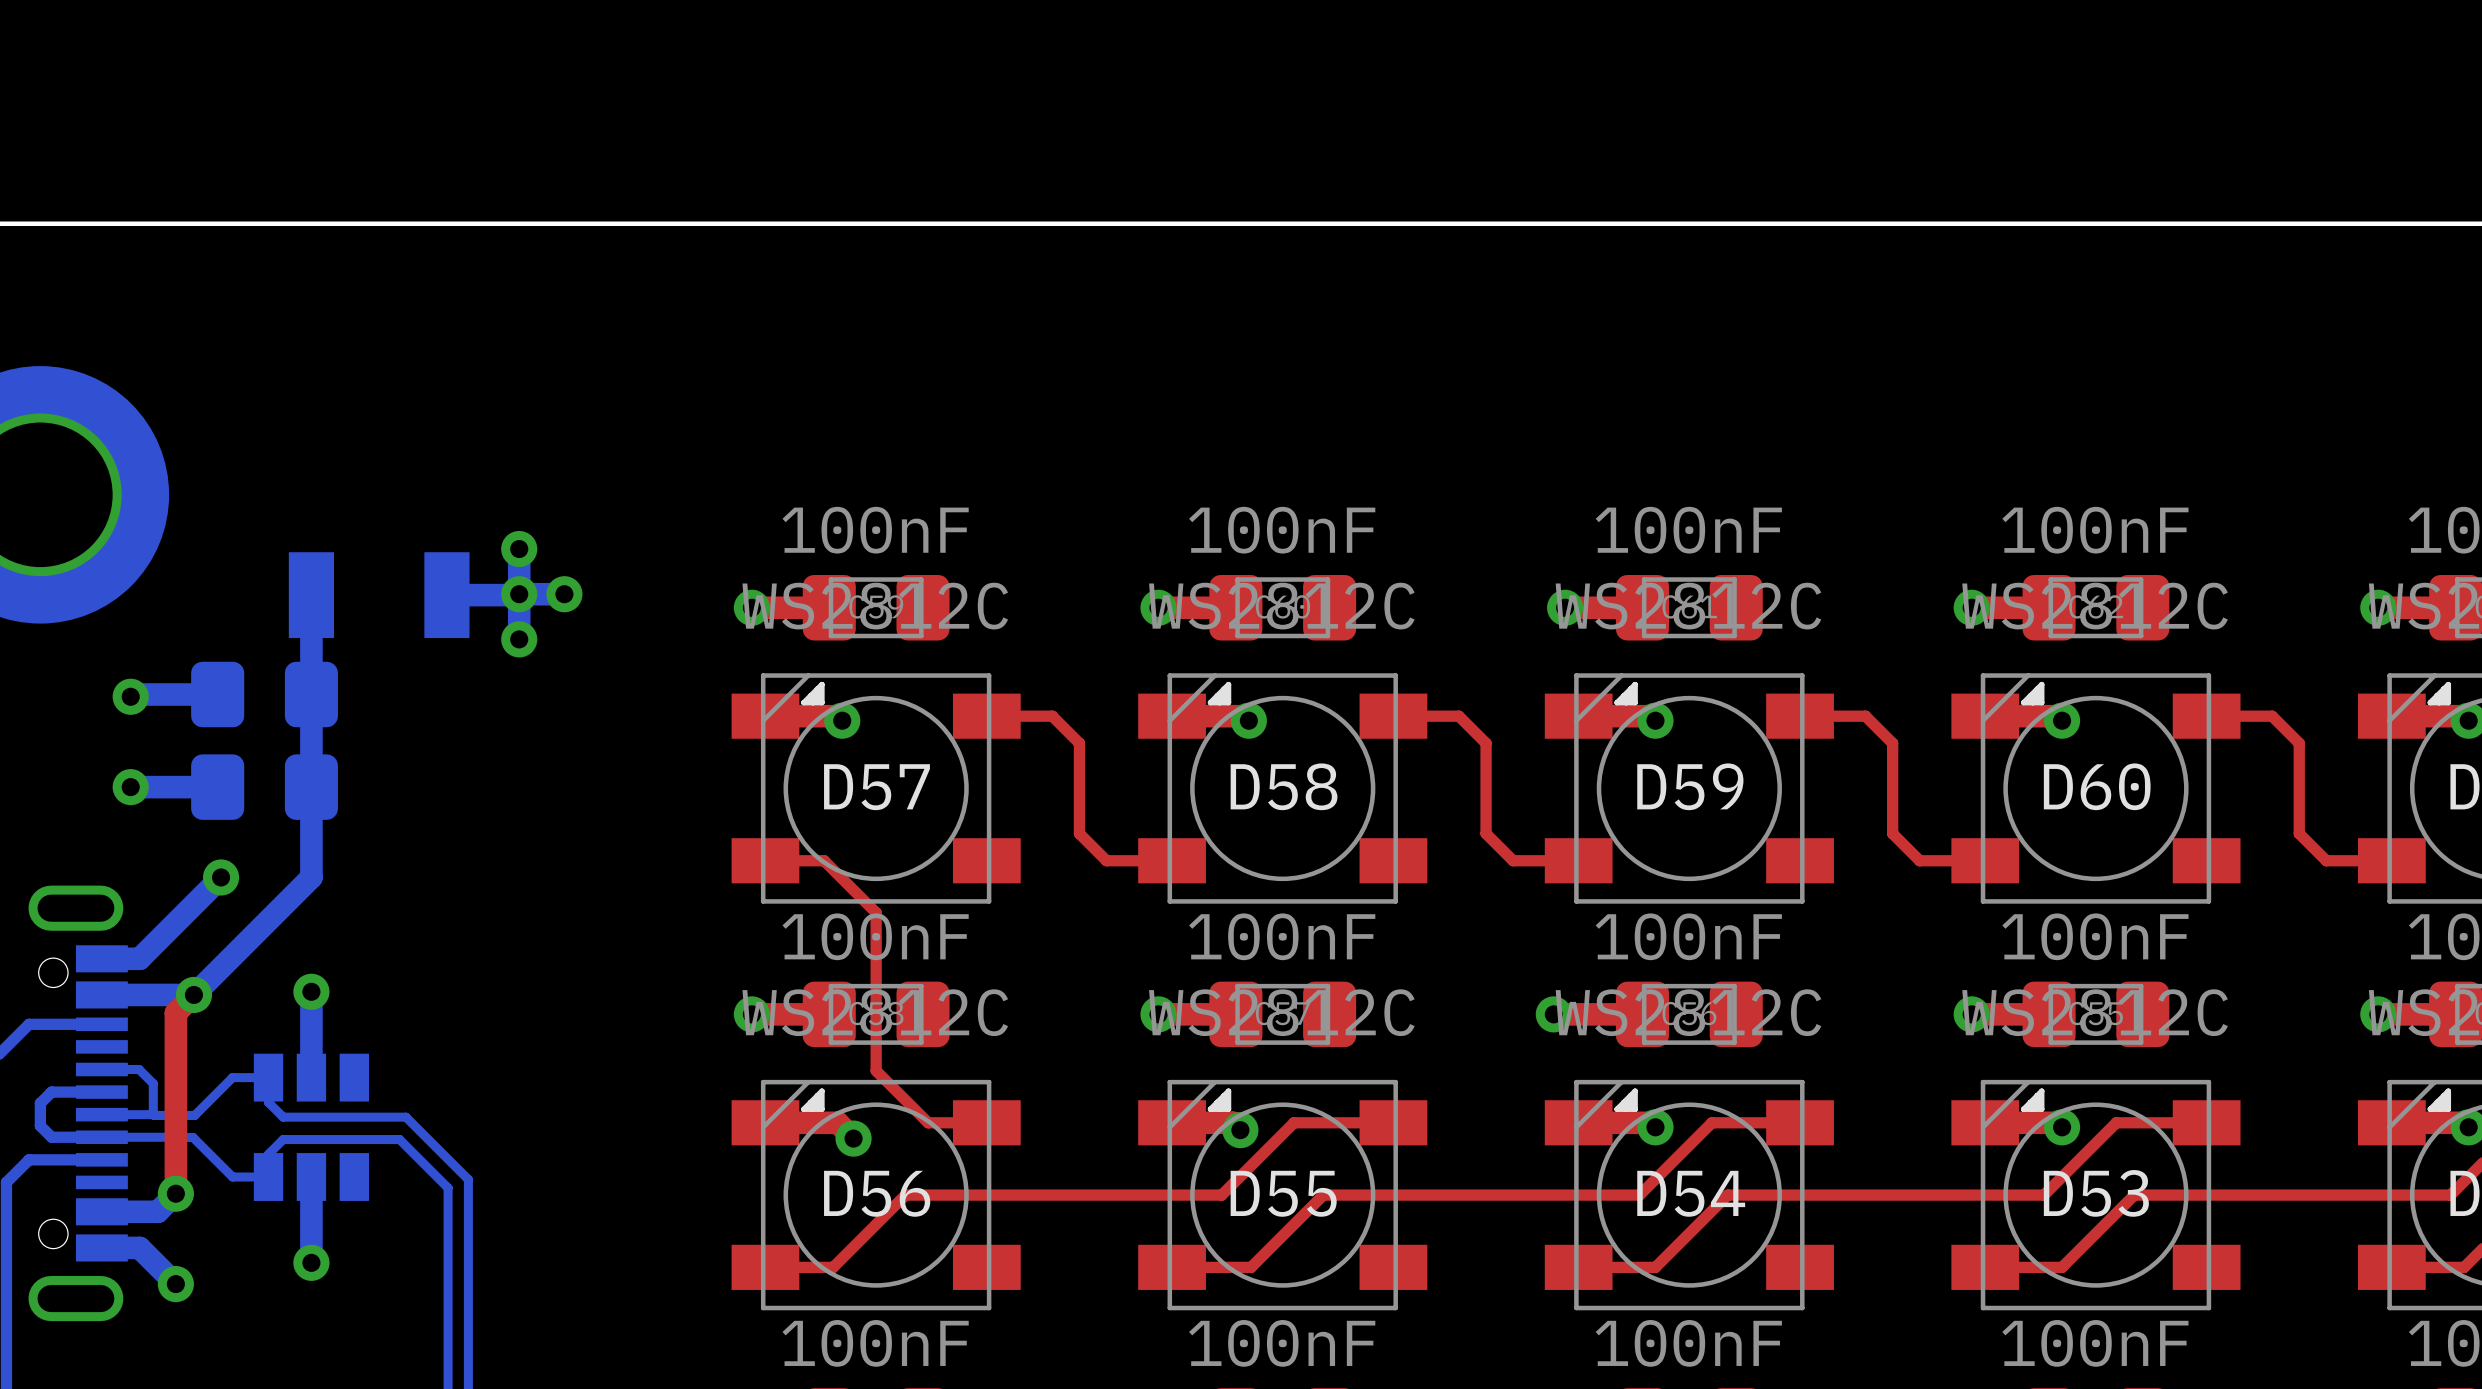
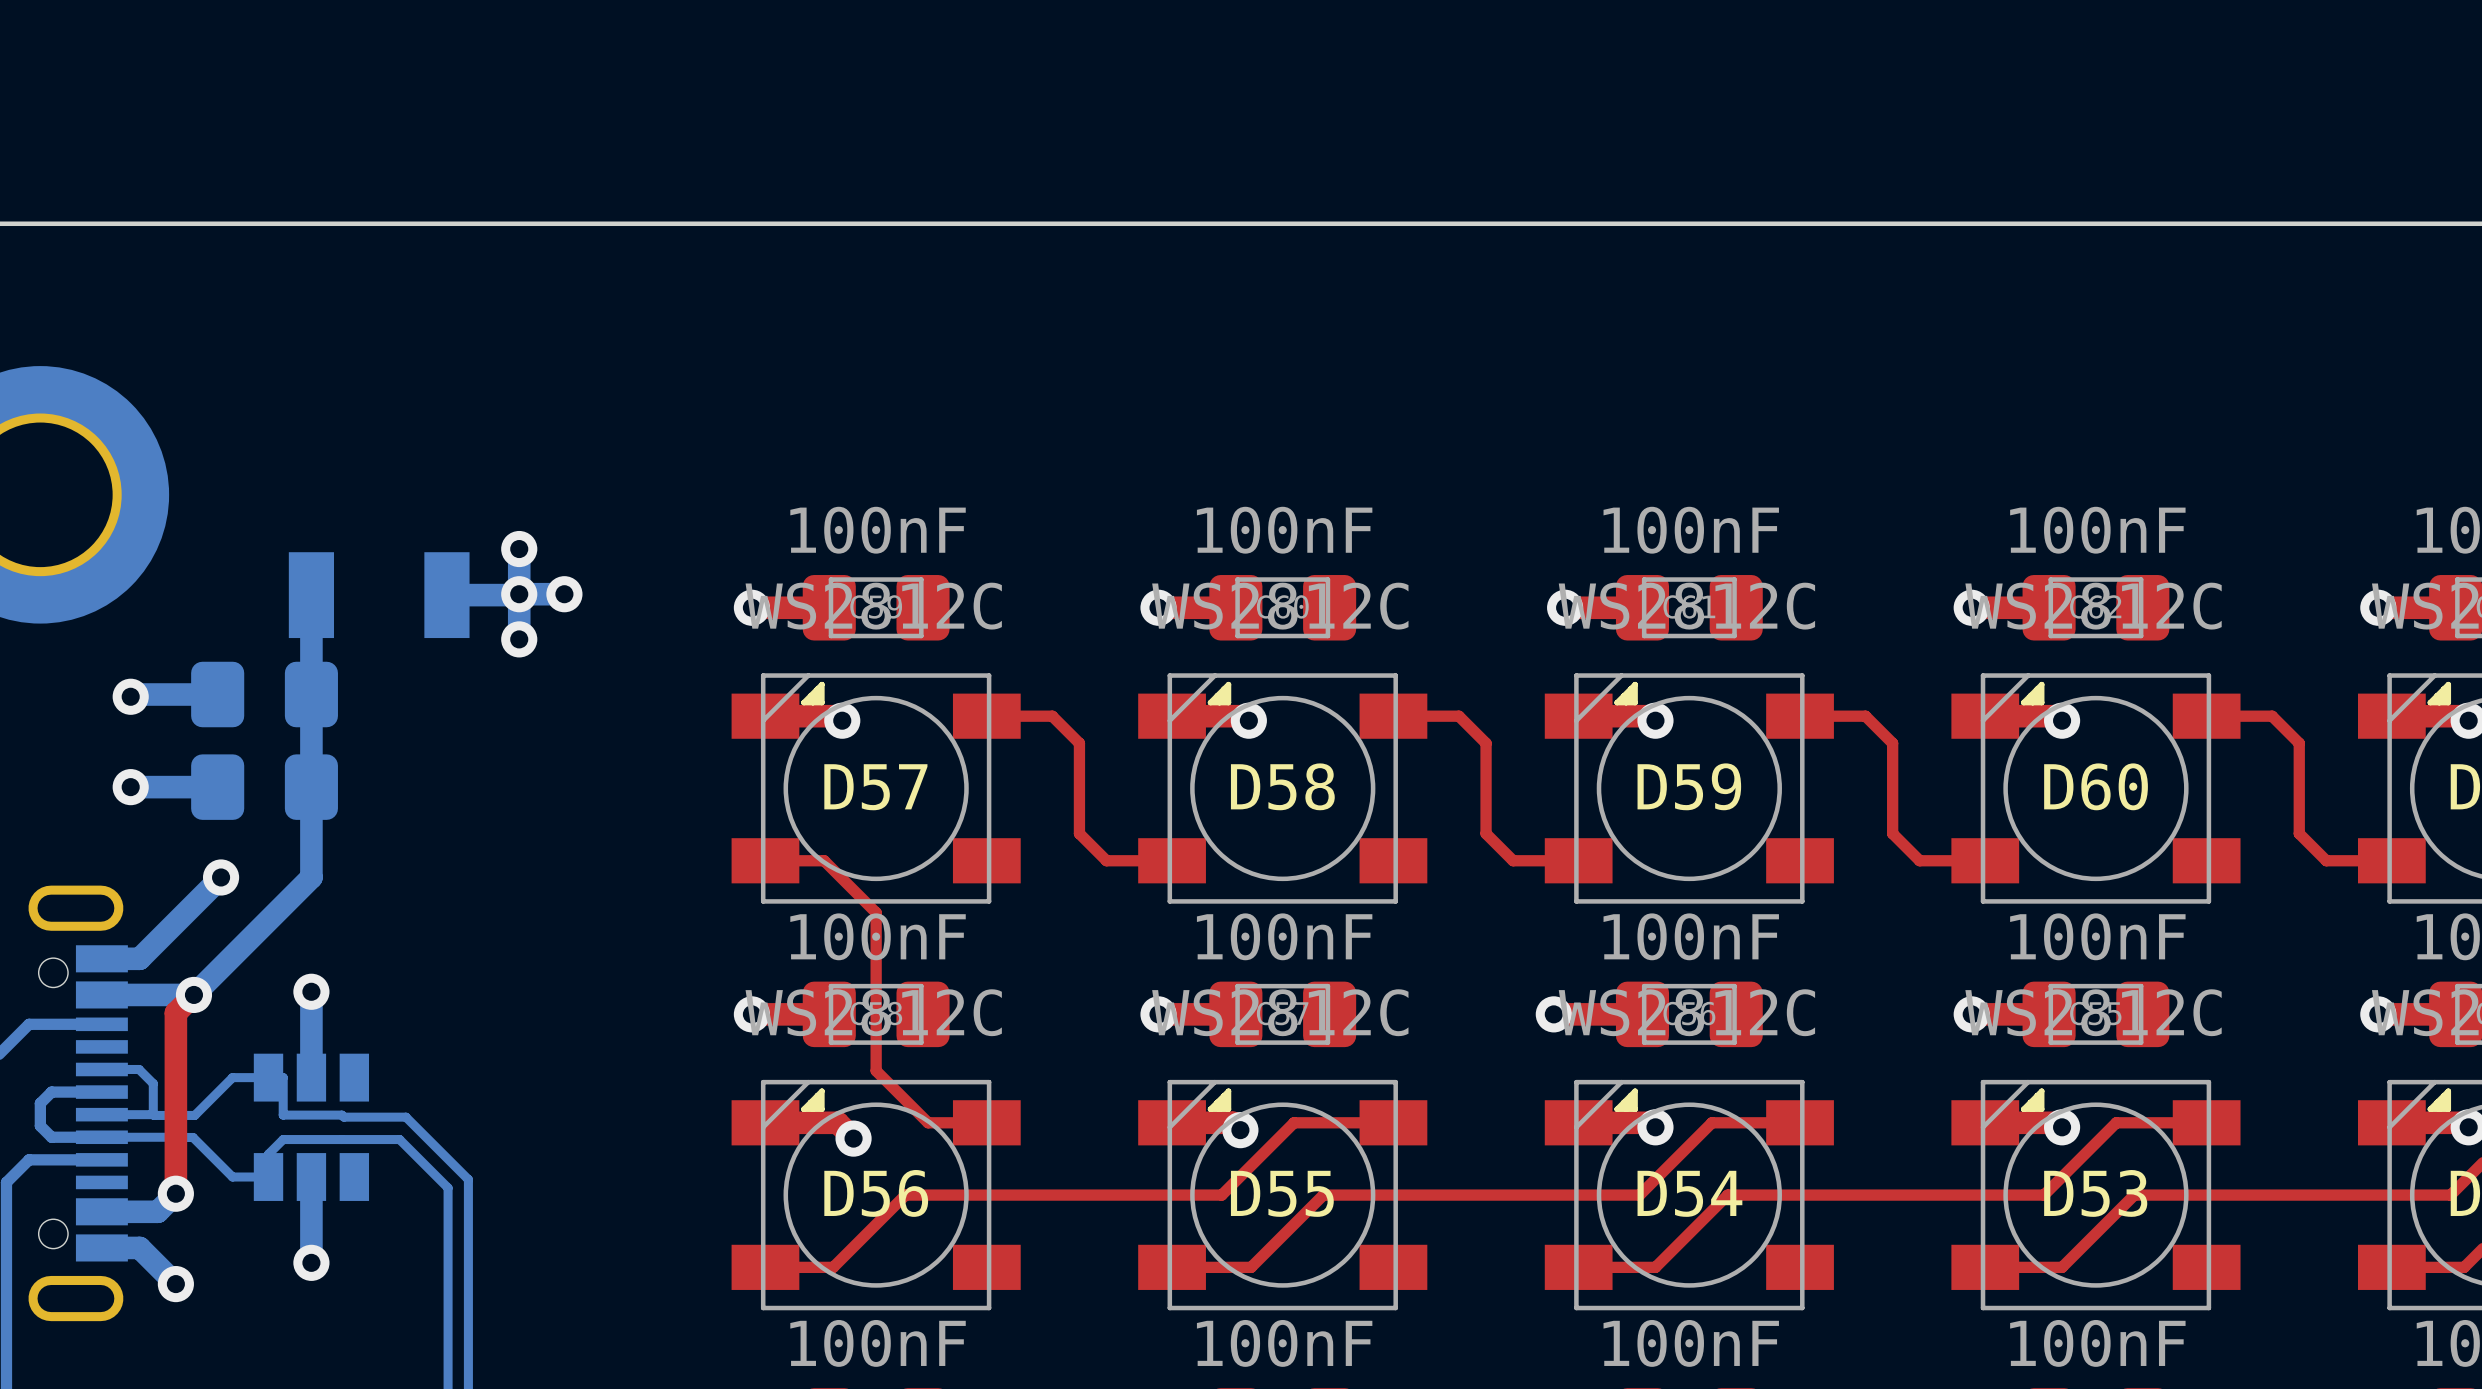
bottom track: (268, 1077) (268, 1102) (283, 1117) (343, 1117) -> (268, 1077) (283, 1077) (283, 1115) (341, 1115) (343, 1117)

